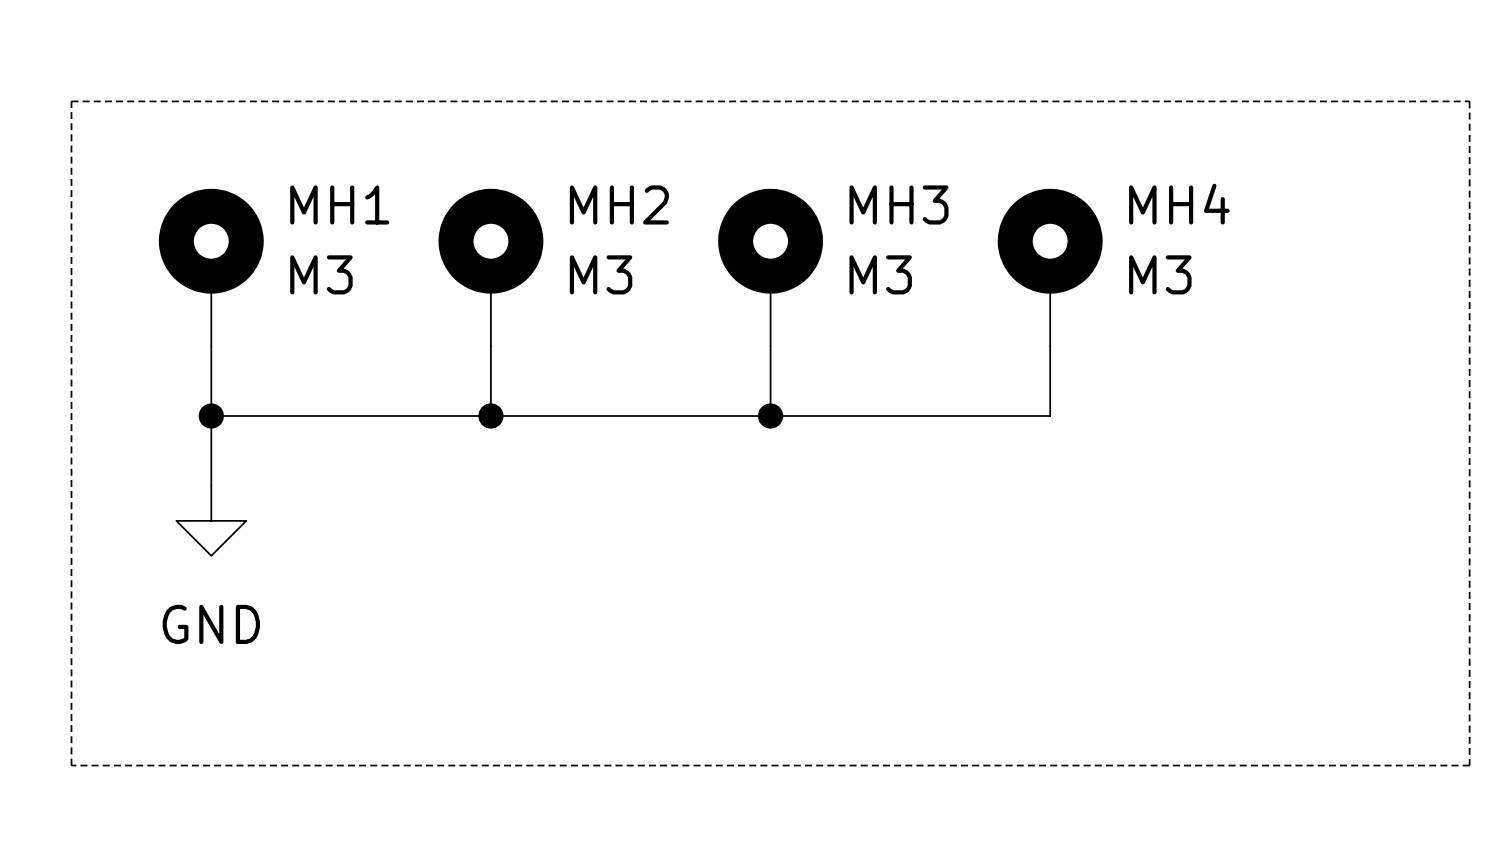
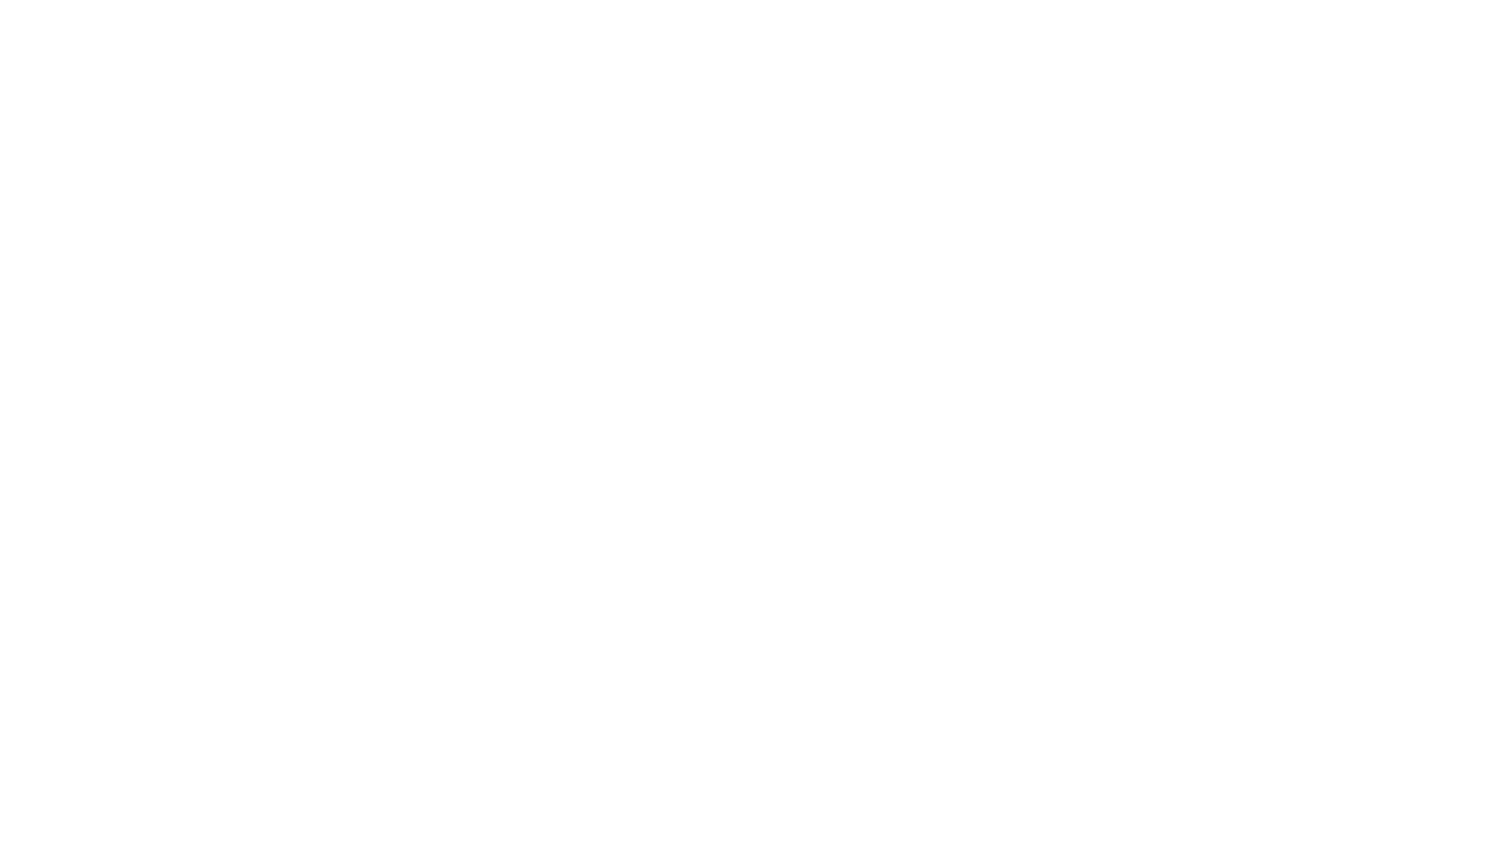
line: (71, 101) (1469, 101) (1469, 765) (71, 765) (71, 101) -> none
MH1: M3 (211, 267) -> none
MH2: M3 (490, 267) -> none
MH3: M3 (770, 267) -> none
MH4: M3 (1050, 267) -> none
wire: (211, 346) (211, 485) -> none
wire: (490, 346) (490, 416) -> none
wire: (770, 346) (770, 416) -> none
wire: (1050, 346) (1050, 416) (211, 416) -> none
junction: (211, 416) -> none
junction: (490, 416) -> none
junction: (770, 416) -> none
power symbol: GND (211, 520) -> none

